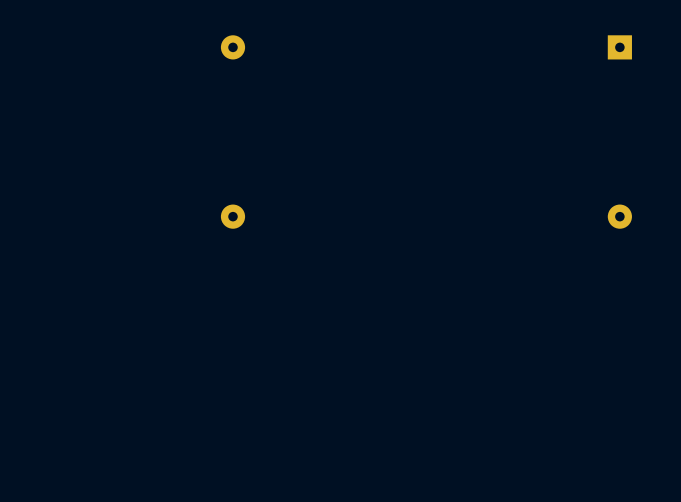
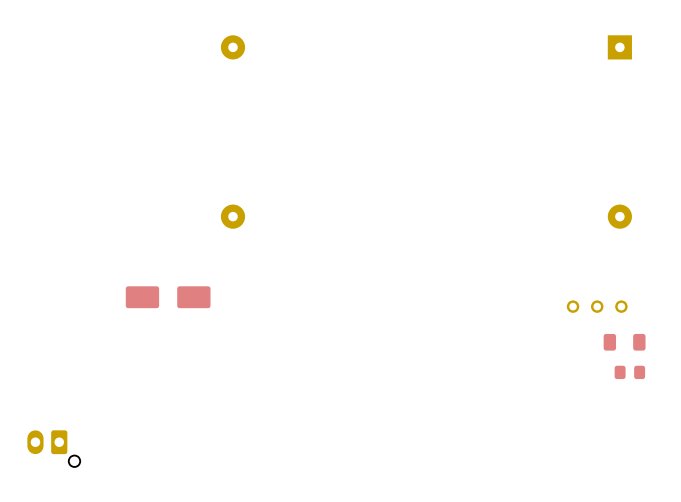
part: none -> (168, 297)
part: none -> (597, 306)
part: none -> (624, 342)
part: none -> (629, 372)
part: none -> (53, 448)

